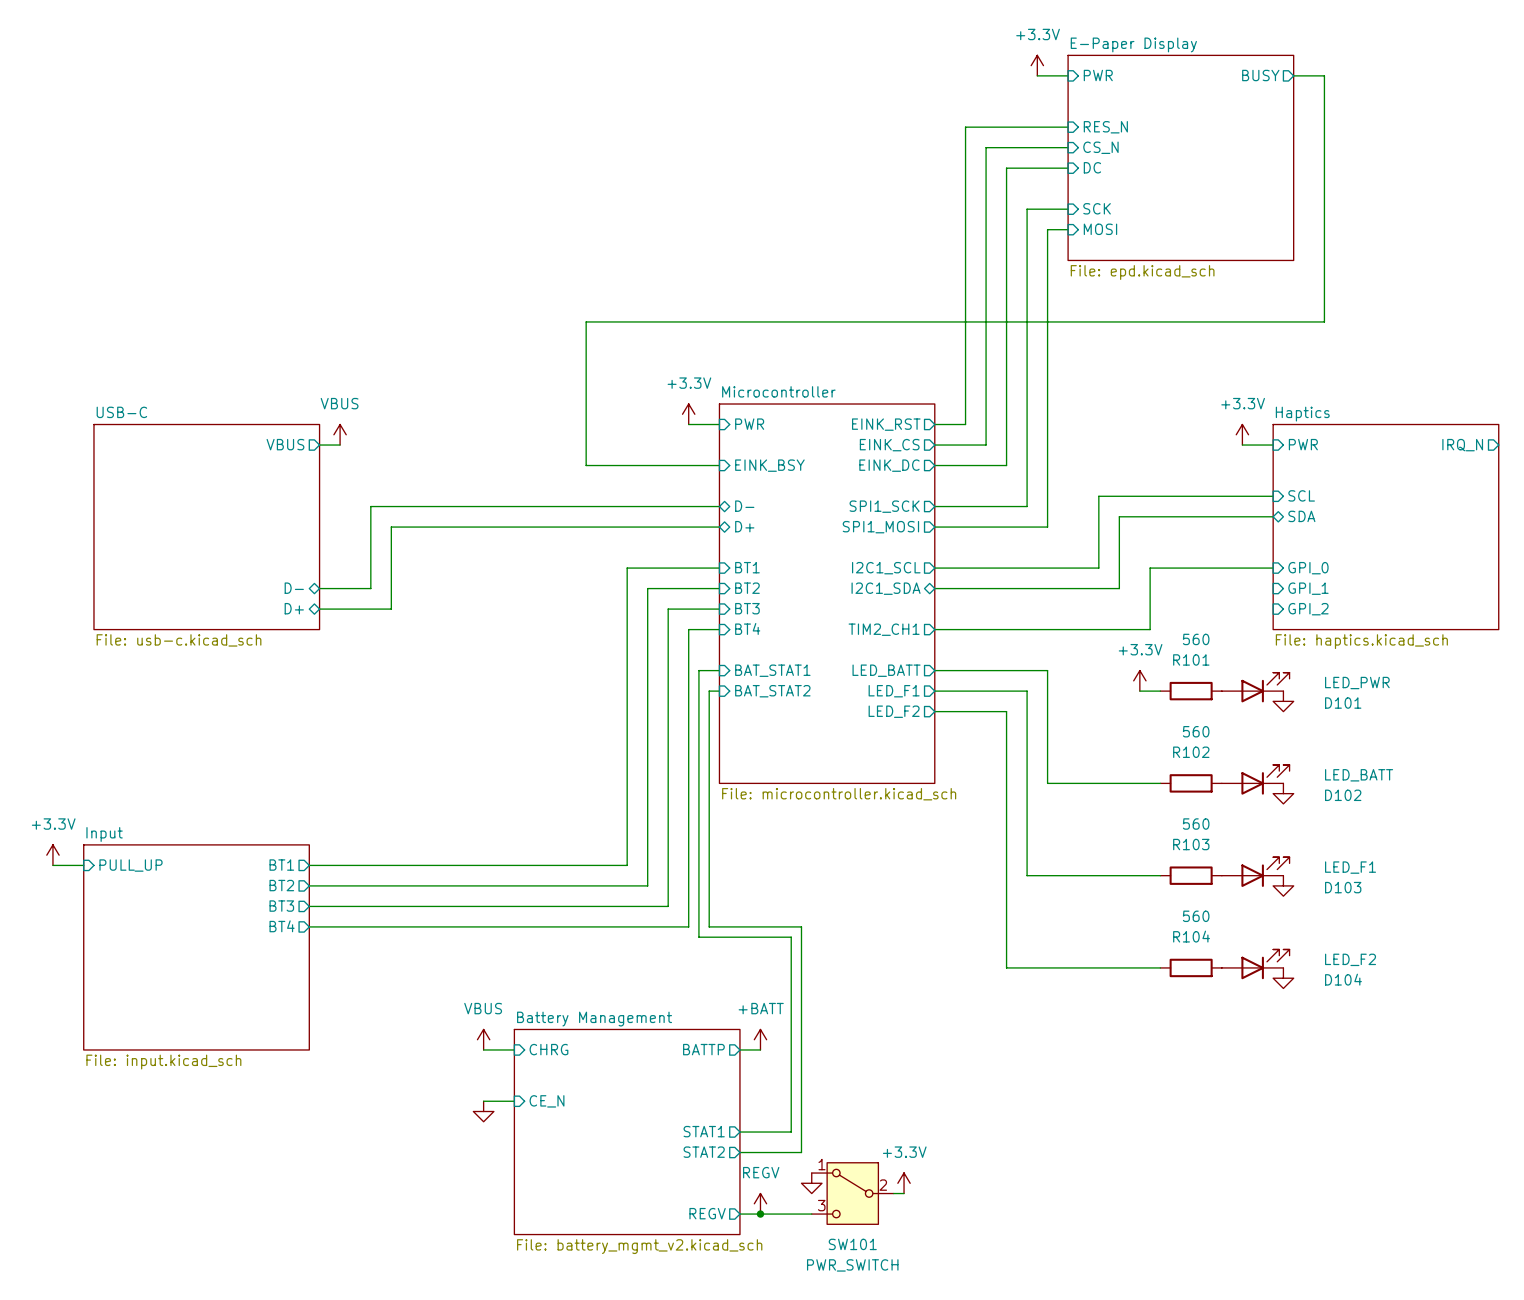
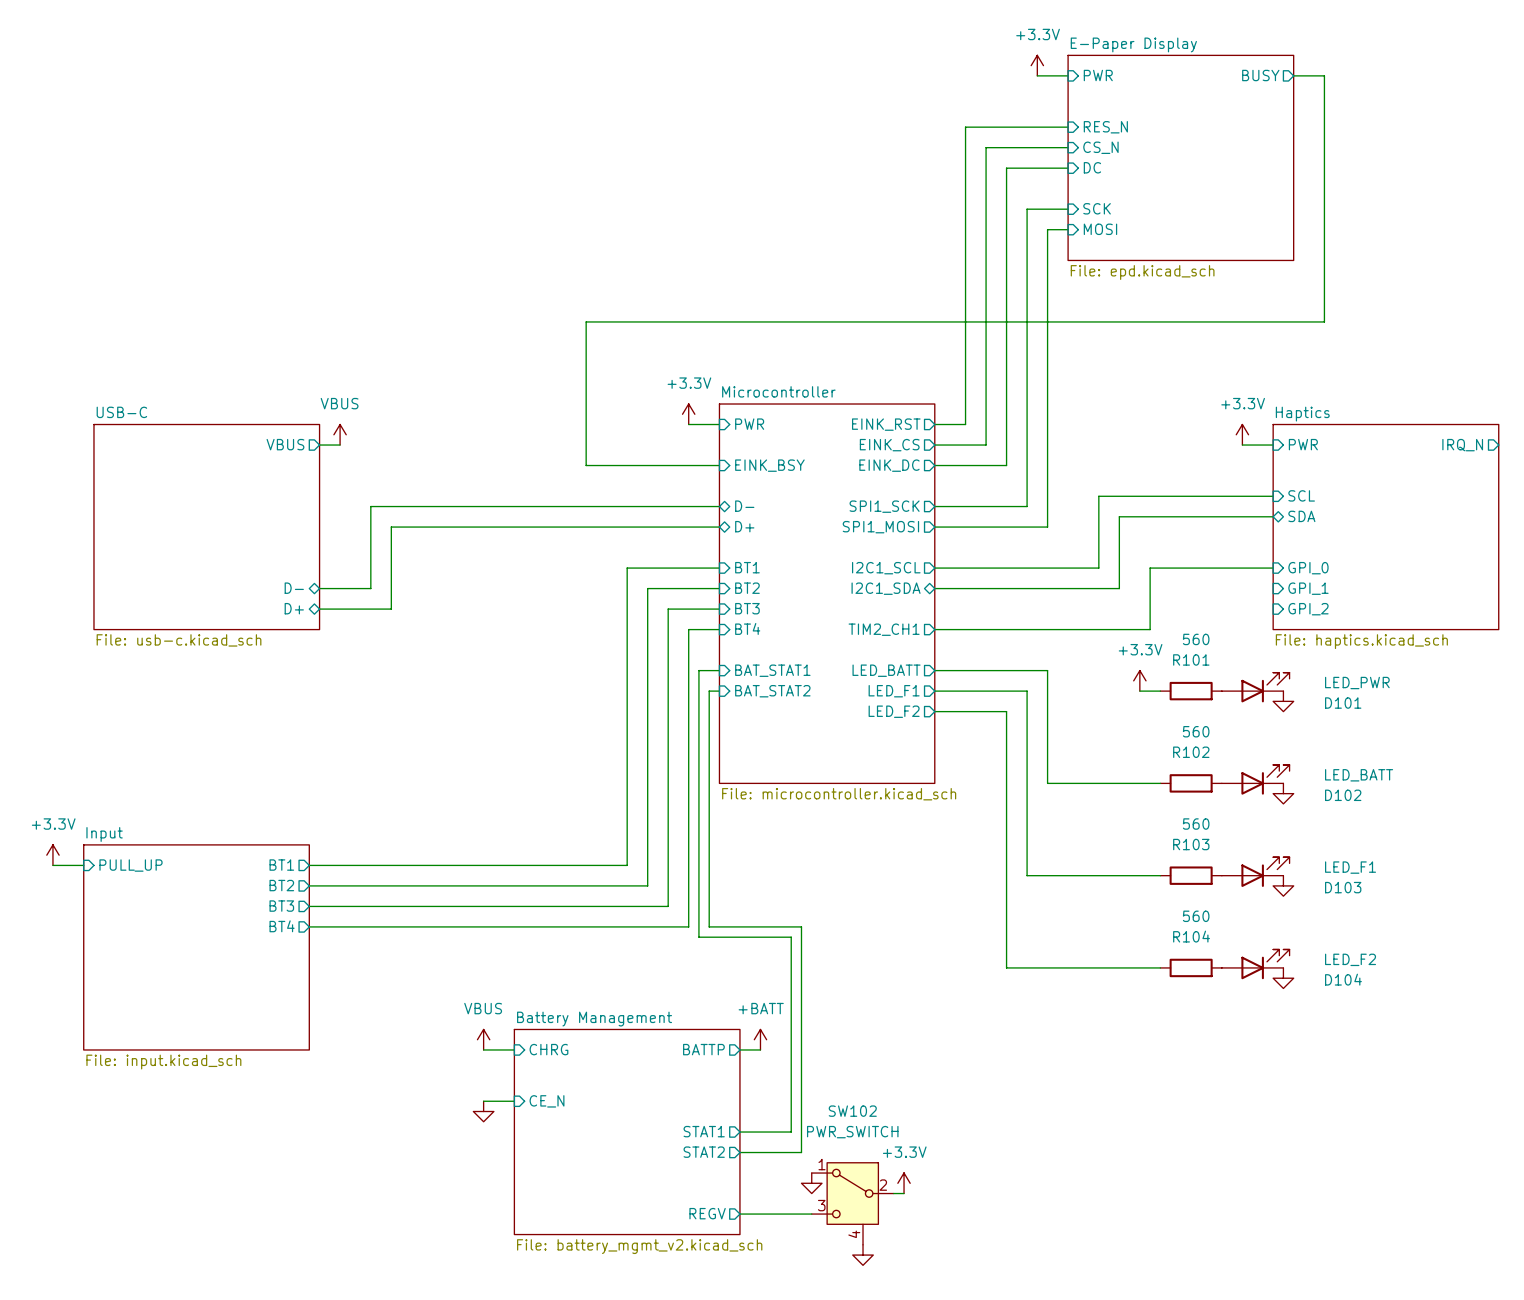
SW101: PWR_SWITCH (852, 1193) -> none
power symbol: REGV (760, 1203) -> none
SW102: none -> PWR_SWITCH (852, 1203)
junction: (760, 1214) -> none
power symbol: none -> (863, 1255)

